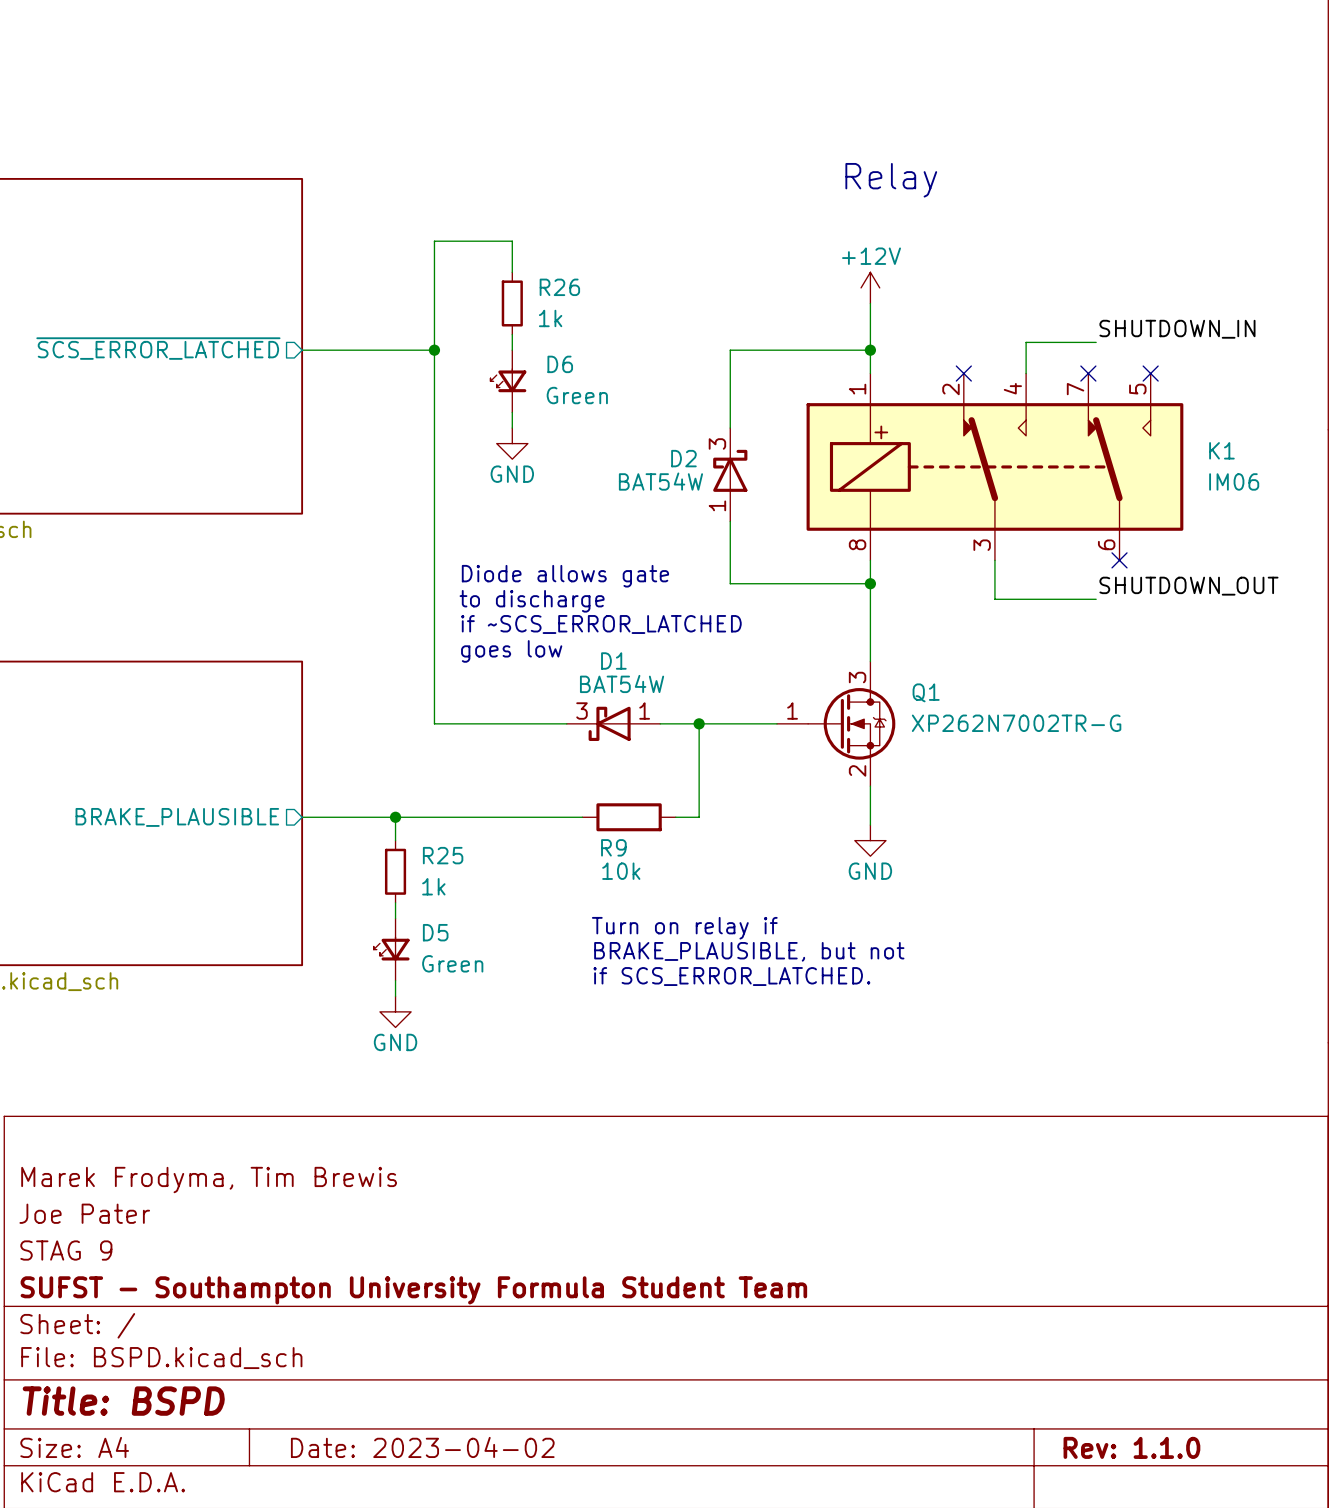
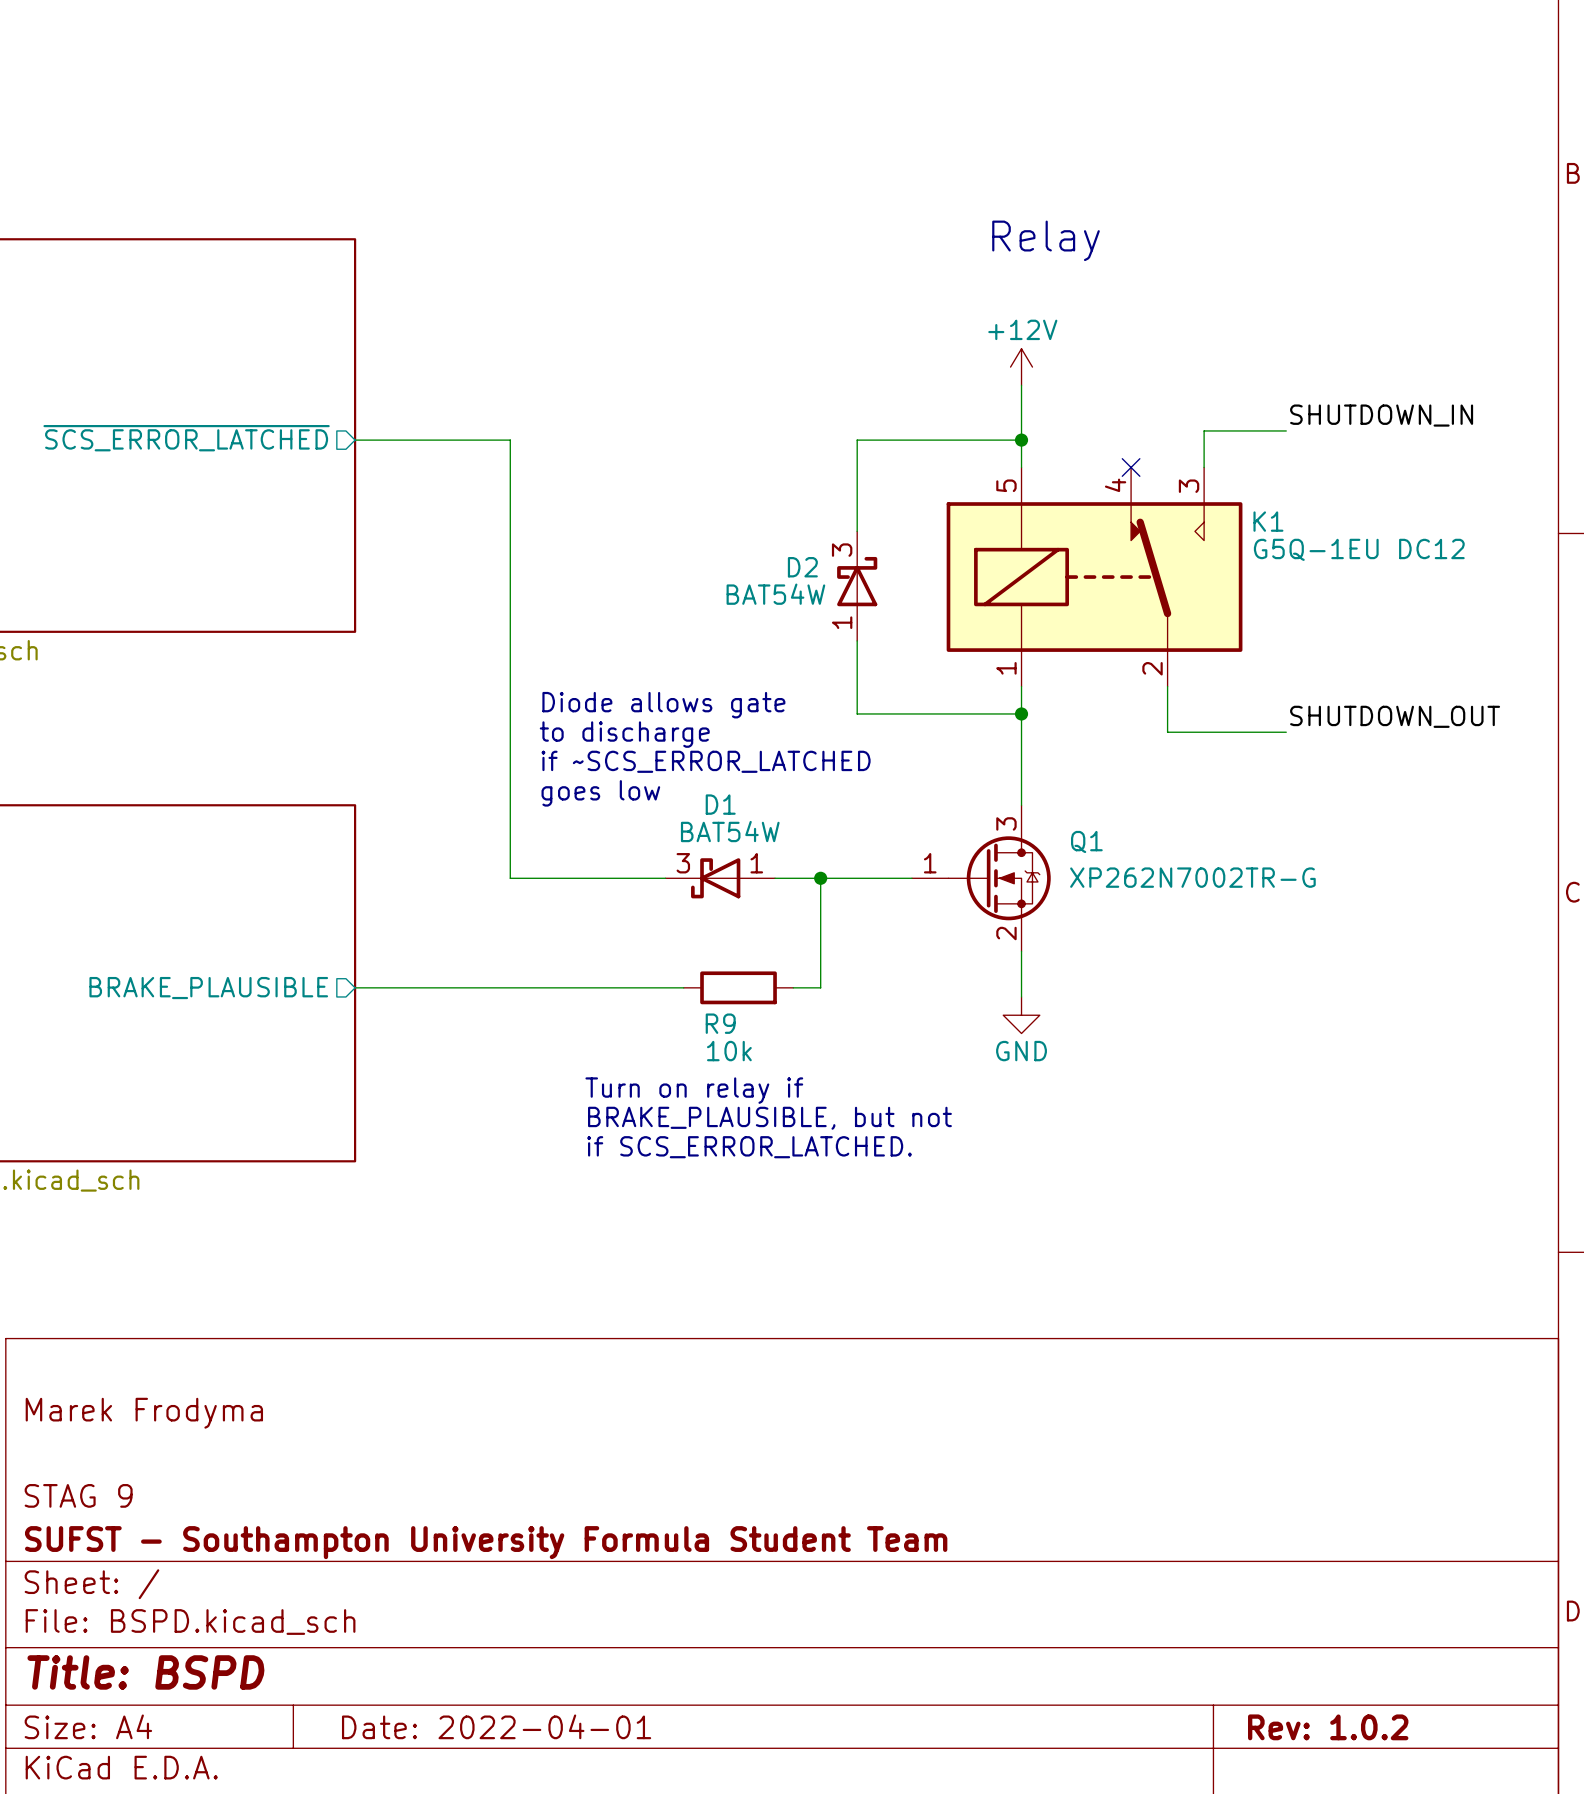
wire: (512, 272) (512, 241) (434, 241) (434, 350) -> none
R26: 1k (512, 303) -> none
wire: (512, 334) (512, 350) -> none
junction: (434, 350) -> none
K1 symbol: [806, 373, 1184, 561] -> [946, 467, 1243, 687]
no-connect mark: (1088, 373) -> none
no-connect mark: (1150, 373) -> none
D6: Green (508, 381) -> none
wire: (512, 412) (512, 428) -> none
power symbol: GND (512, 443) -> none
K1 name position: K1 (1221, 450) -> K1 (1268, 521)
K1 value: IM06 (1234, 481) -> G5Q-1EU DC12 (1359, 549)
no-connect mark: (1119, 560) -> none
wire: (395, 817) (395, 840) -> none
junction: (395, 817) -> none
R25: 1k (395, 871) -> none
wire: (395, 902) (395, 918) -> none
text position: Turn on relay if (684, 928) -> Turn on relay if (694, 1090)
D5: Green (391, 949) -> none
text position: BRAKE_PLAUSIBLE, but not (749, 951) -> BRAKE_PLAUSIBLE, but not (769, 1118)
text position: if SCS_ERROR_LATCHED. (731, 976) -> if SCS_ERROR_LATCHED. (749, 1147)
wire: (395, 980) (395, 996) -> none
power symbol: GND (395, 1011) -> none
title block: Marek Frodyma, Tim Brewis (209, 1180) -> Marek Frodyma (144, 1413)
title block: Joe Pater (84, 1213) -> none
title block: Date: 2023-04-02 (422, 1447) -> Date: 2022-04-01 (496, 1726)
title block: Rev: 1.1.0 (1131, 1447) -> Rev: 1.0.2 (1328, 1727)

